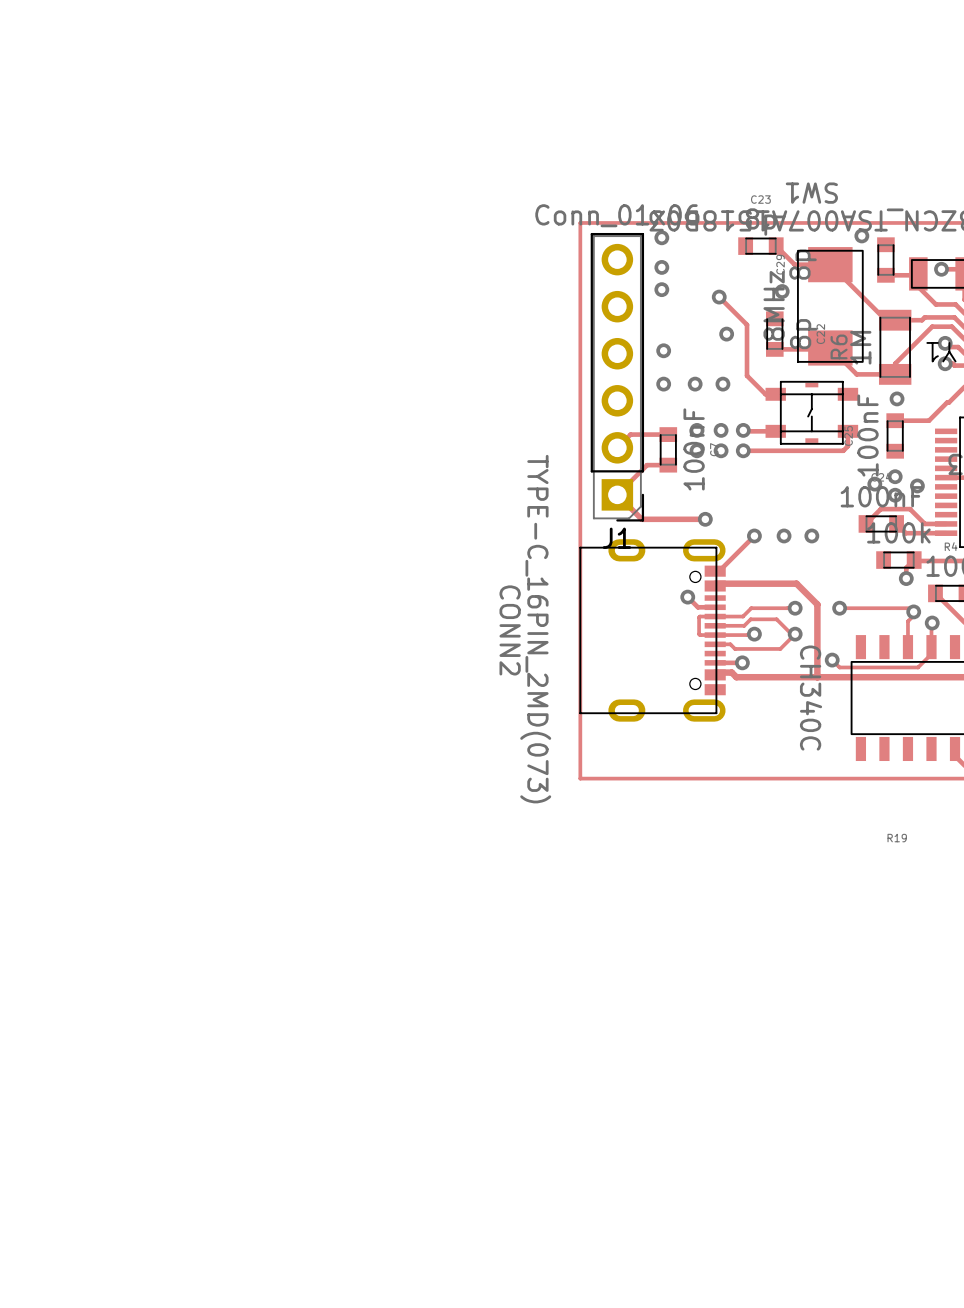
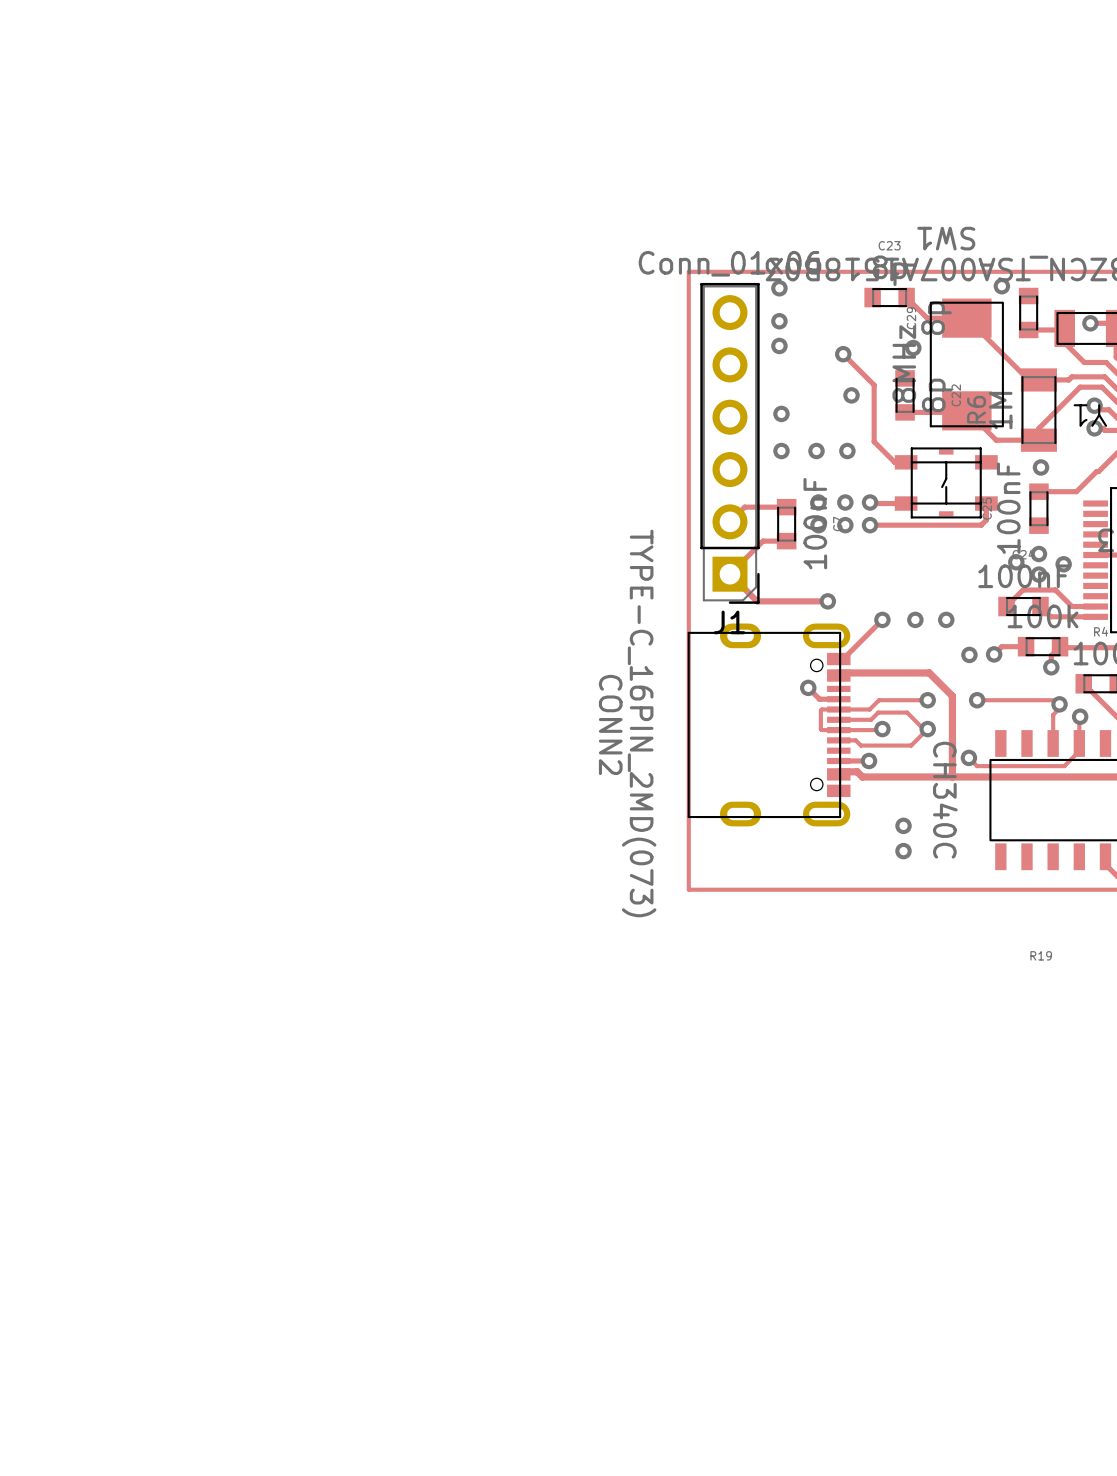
track: none -> (1026, 646) (1001, 646) (994, 654)
via: none -> (969, 654)
via: none -> (994, 654)
via: none -> (903, 825)
via: none -> (903, 851)

